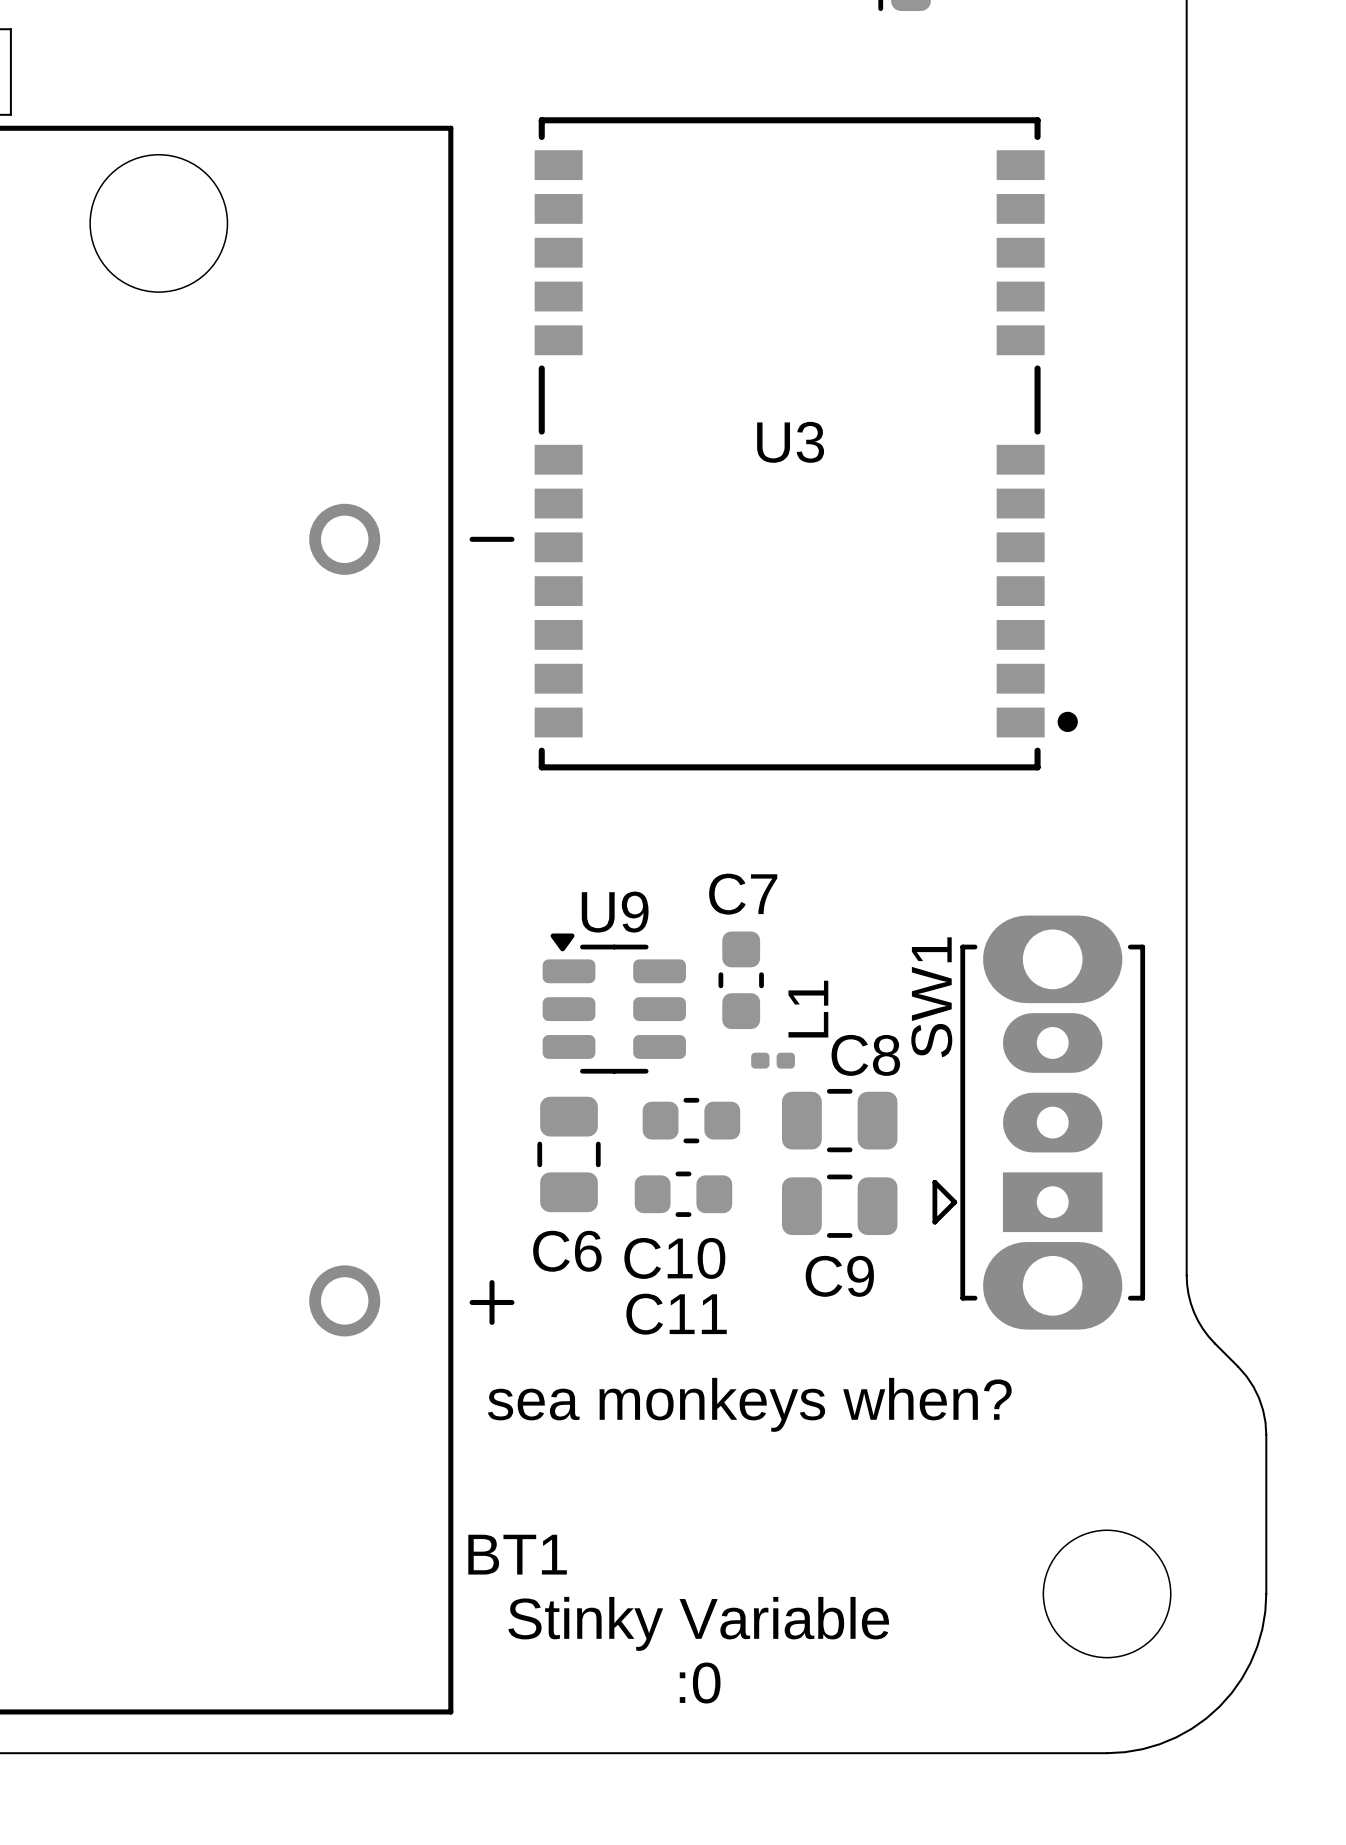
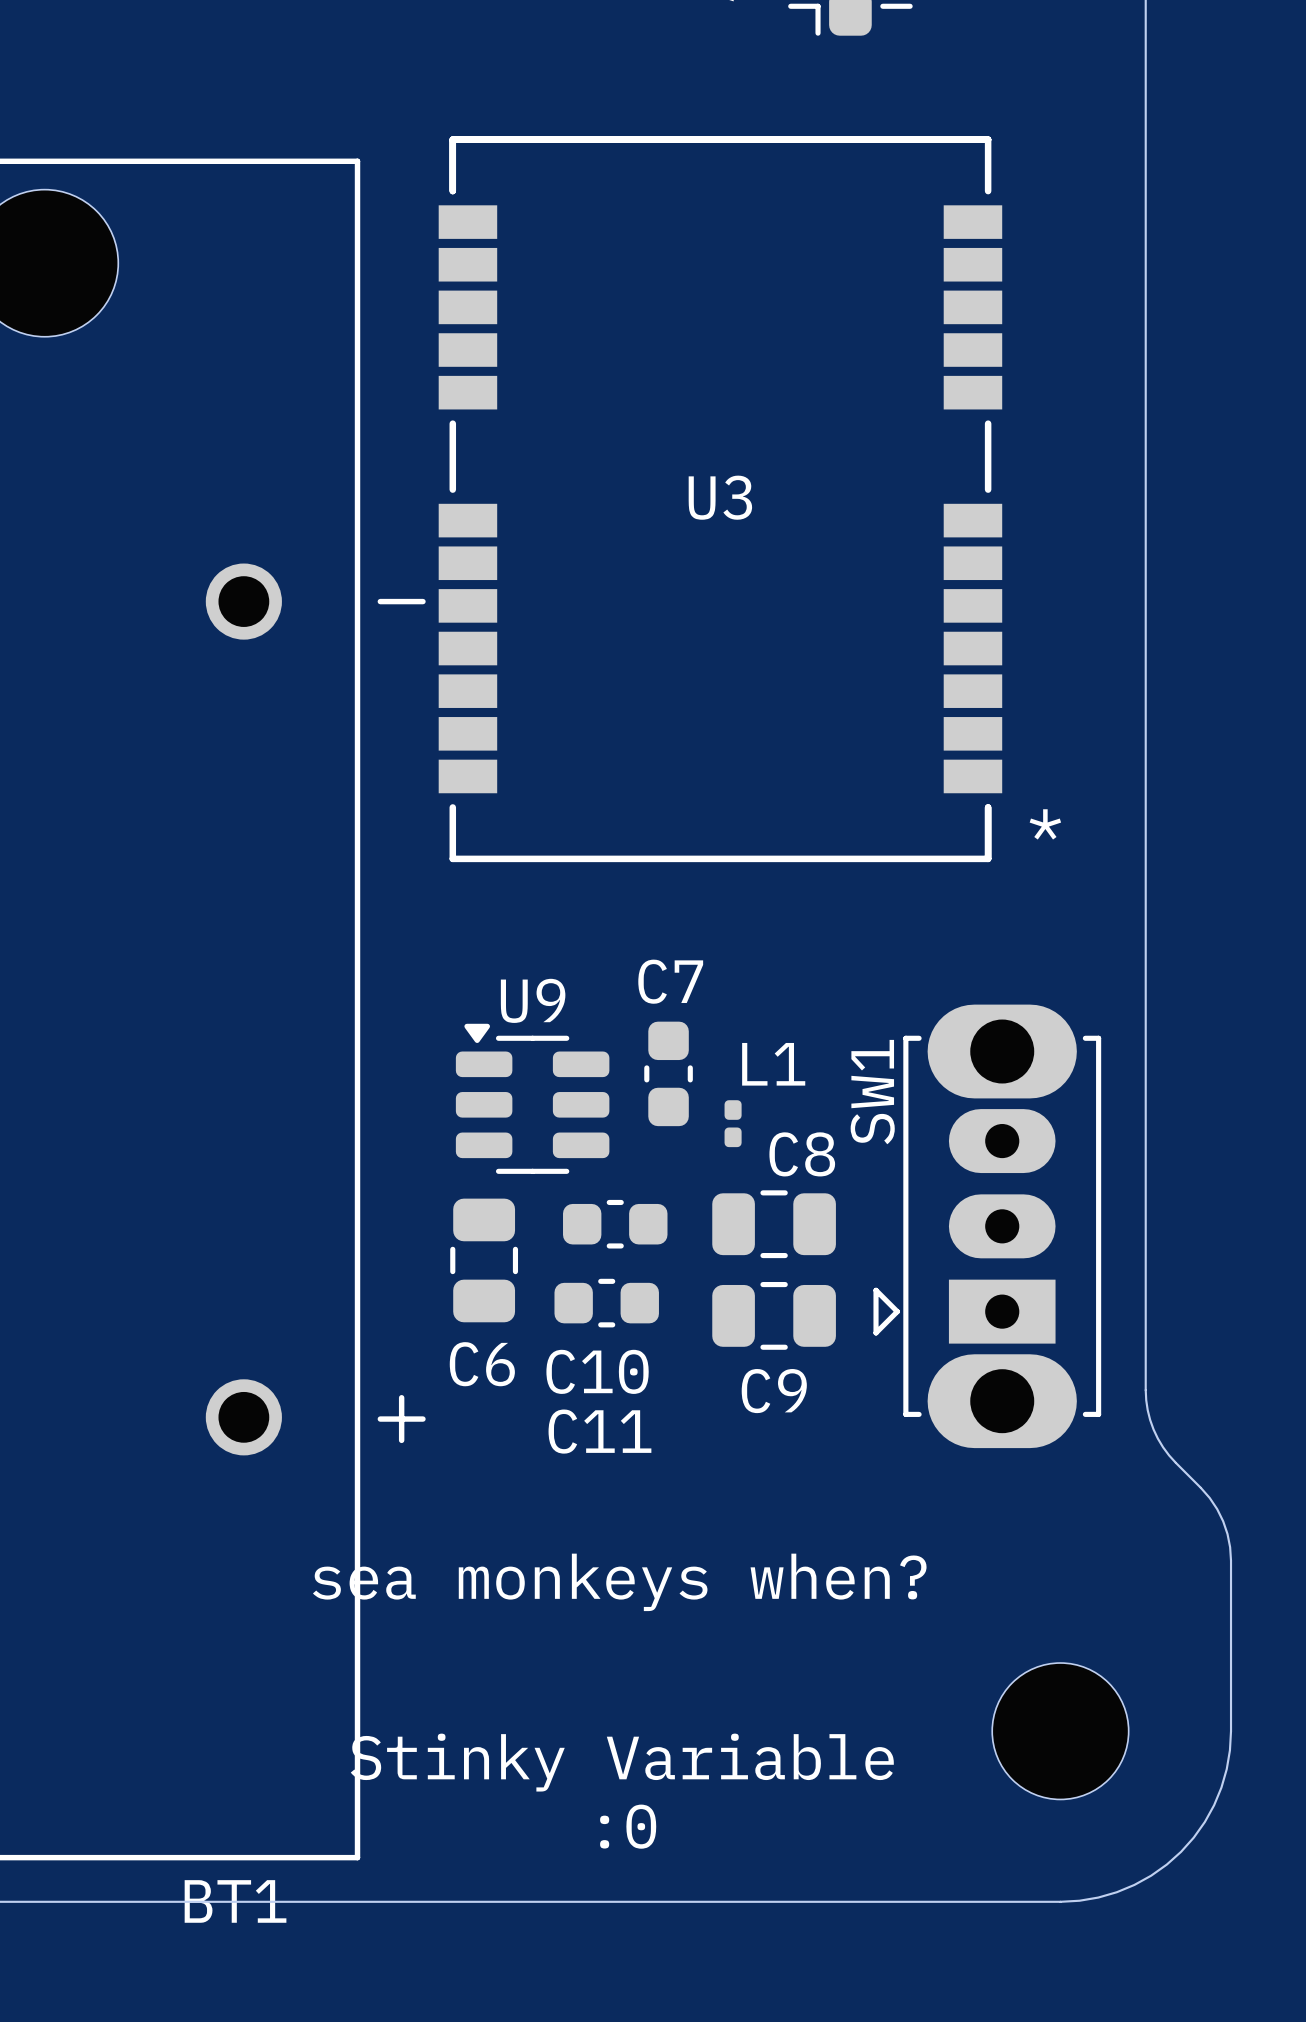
U3 footprint: [534, 117, 1078, 771] -> [438, 136, 1003, 863]
L1 rotation: 0° (773, 1060) -> 90° clockwise (733, 1123)
L1 position: (773, 1060) -> (733, 1123)
text position: sea monkeys when? (749, 1404) -> sea monkeys when? (619, 1582)
BT1 name position: BT1 (517, 1554) -> BT1 (235, 1901)

